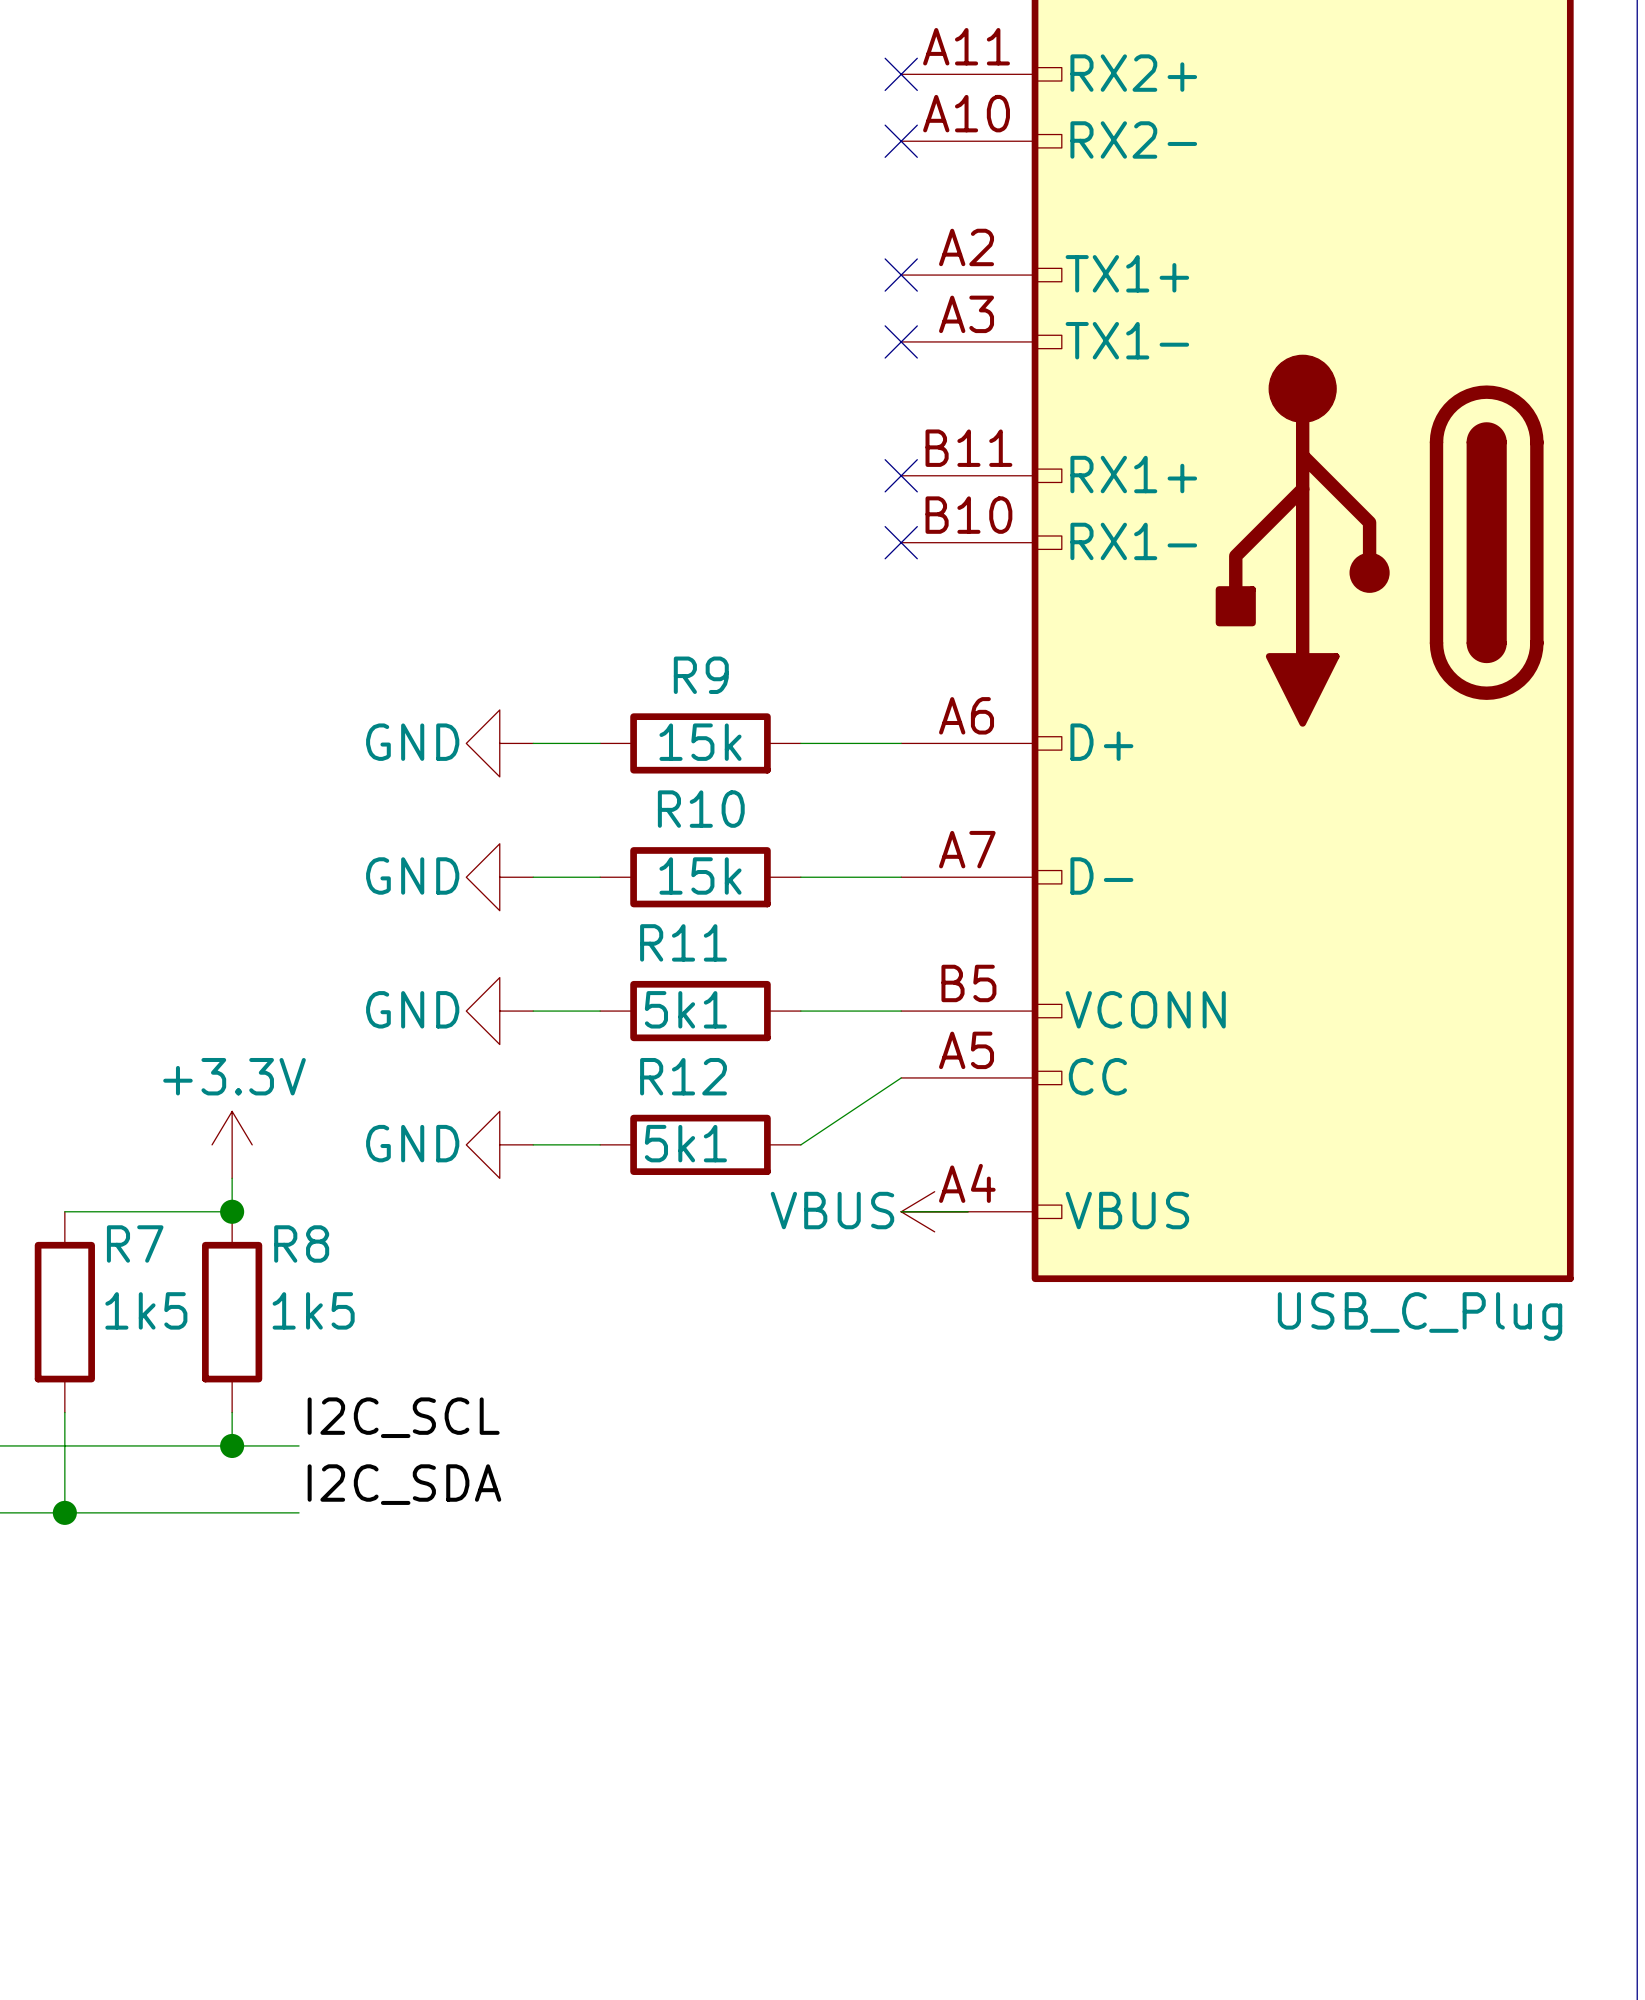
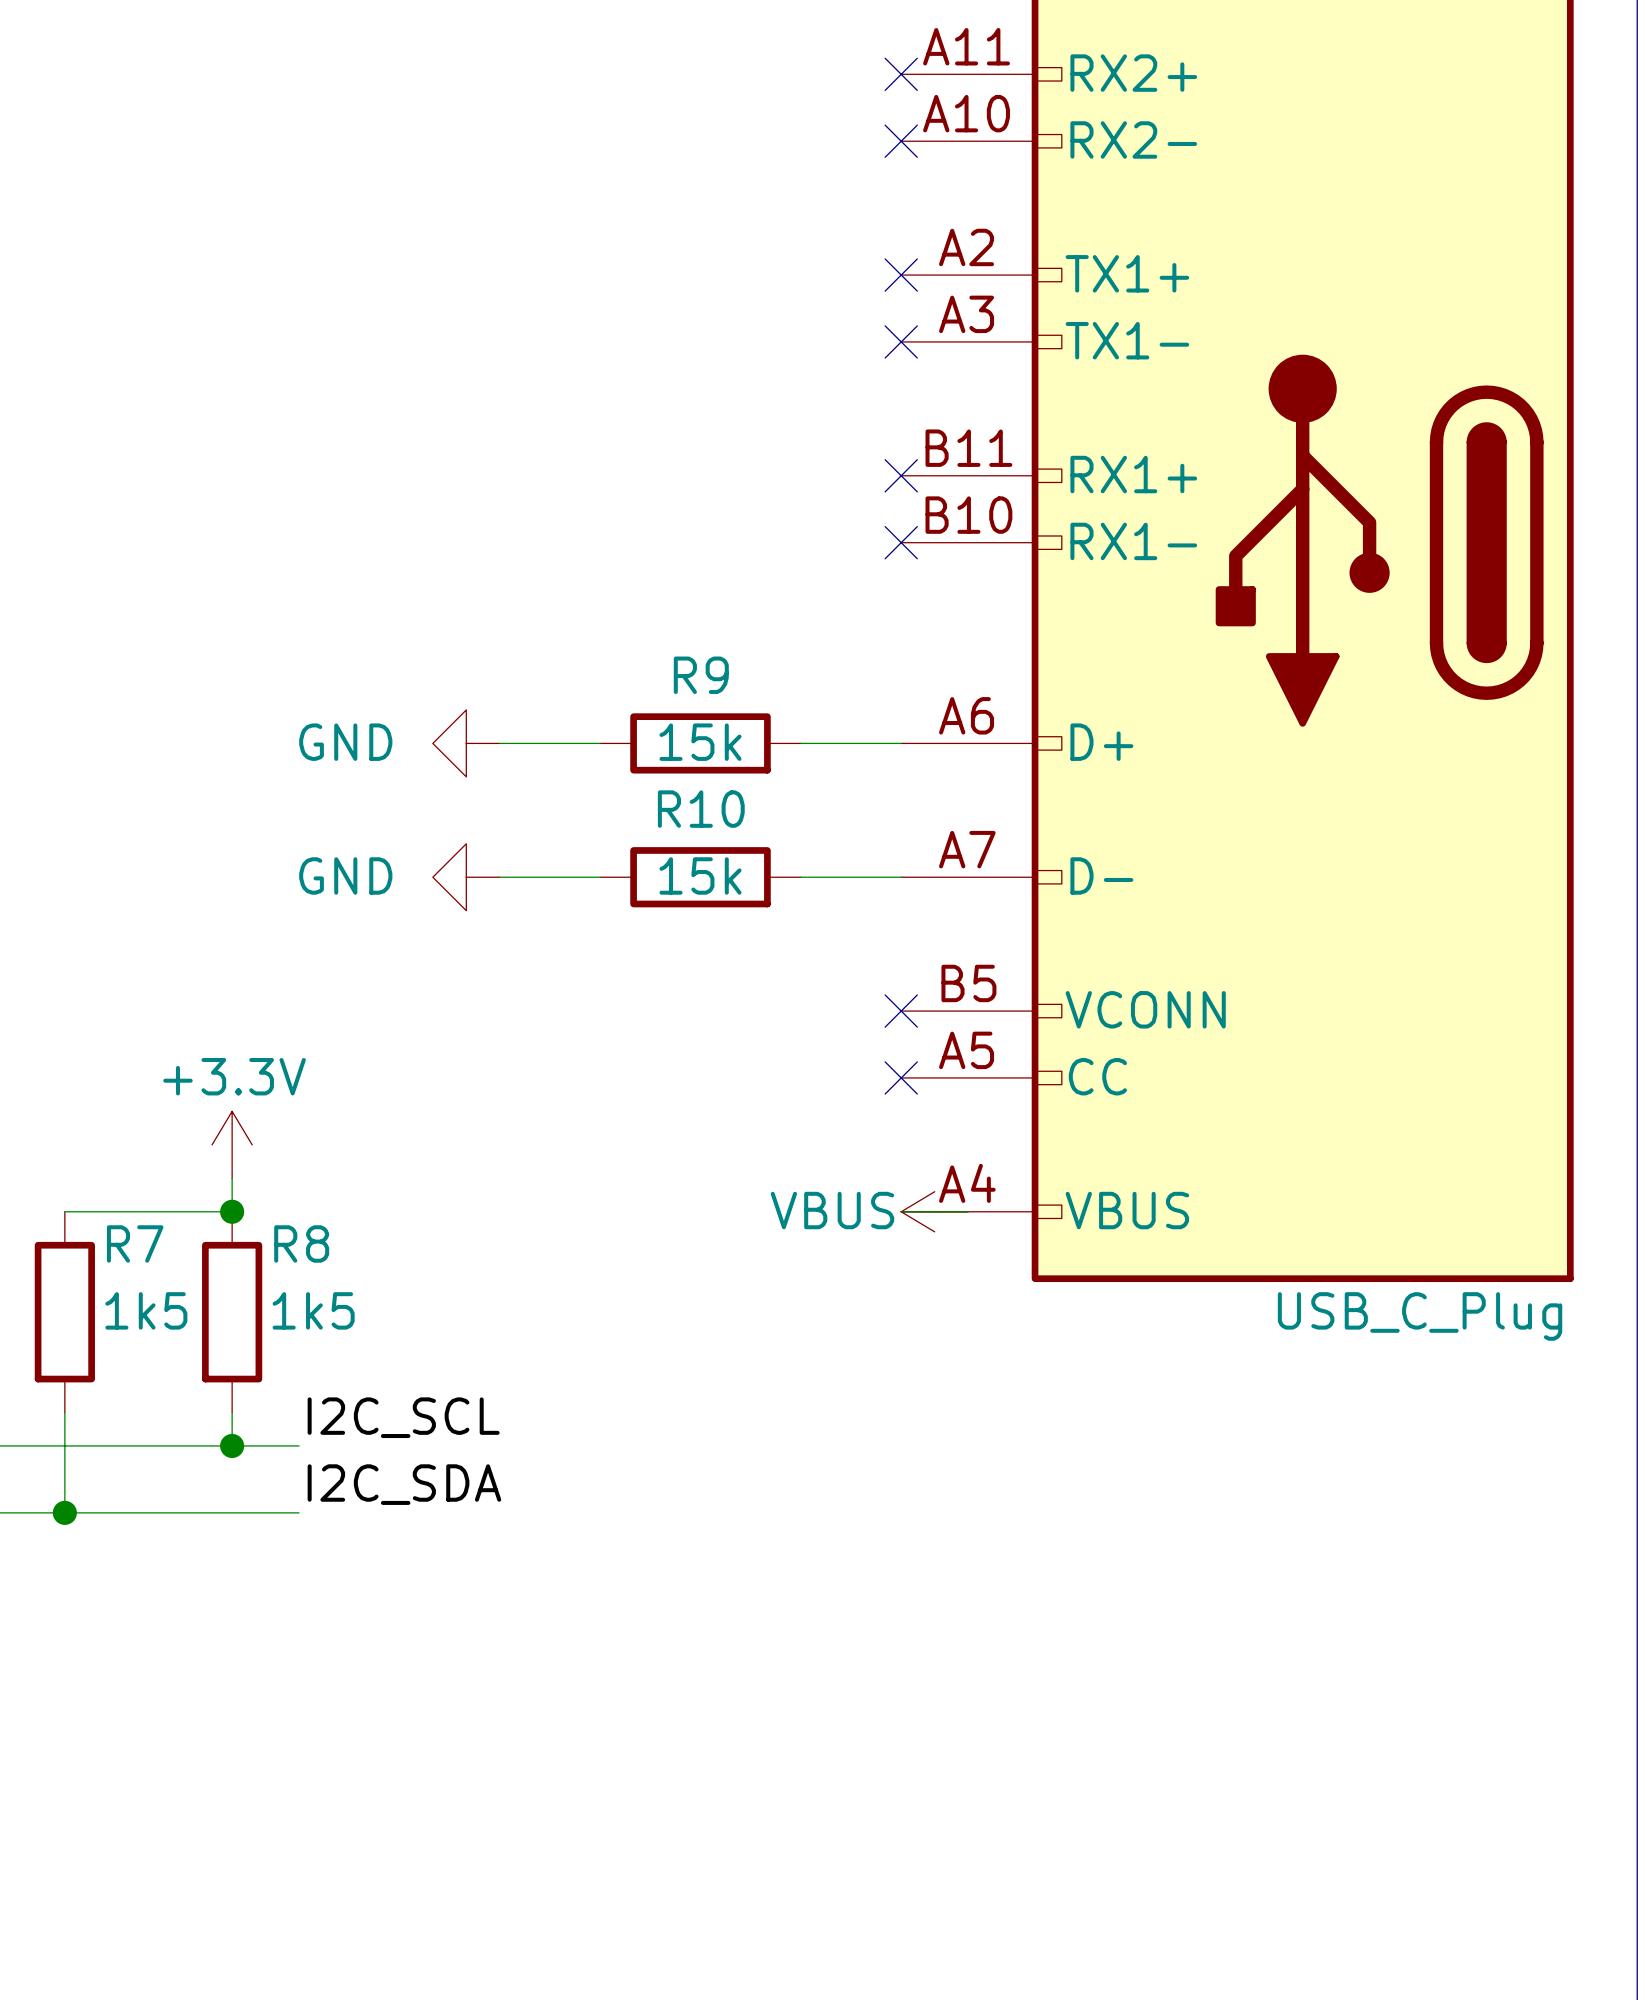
power symbol text position: GND (412, 742) -> GND (345, 742)
power symbol position: GND (499, 743) -> GND (466, 743)
power symbol text position: GND (412, 875) -> GND (345, 875)
power symbol position: GND (499, 877) -> GND (466, 877)
power symbol: GND (499, 1011) -> none
wire: (533, 1011) (600, 1011) -> none
R11: 5k1 (700, 1011) -> none
wire: (800, 1011) (901, 1011) -> none
no-connect mark: none -> (901, 1011)
wire: (901, 1077) (800, 1144) -> none
no-connect mark: none -> (901, 1077)
power symbol: GND (499, 1144) -> none
wire: (533, 1144) (600, 1144) -> none
R12: 5k1 (700, 1144) -> none

